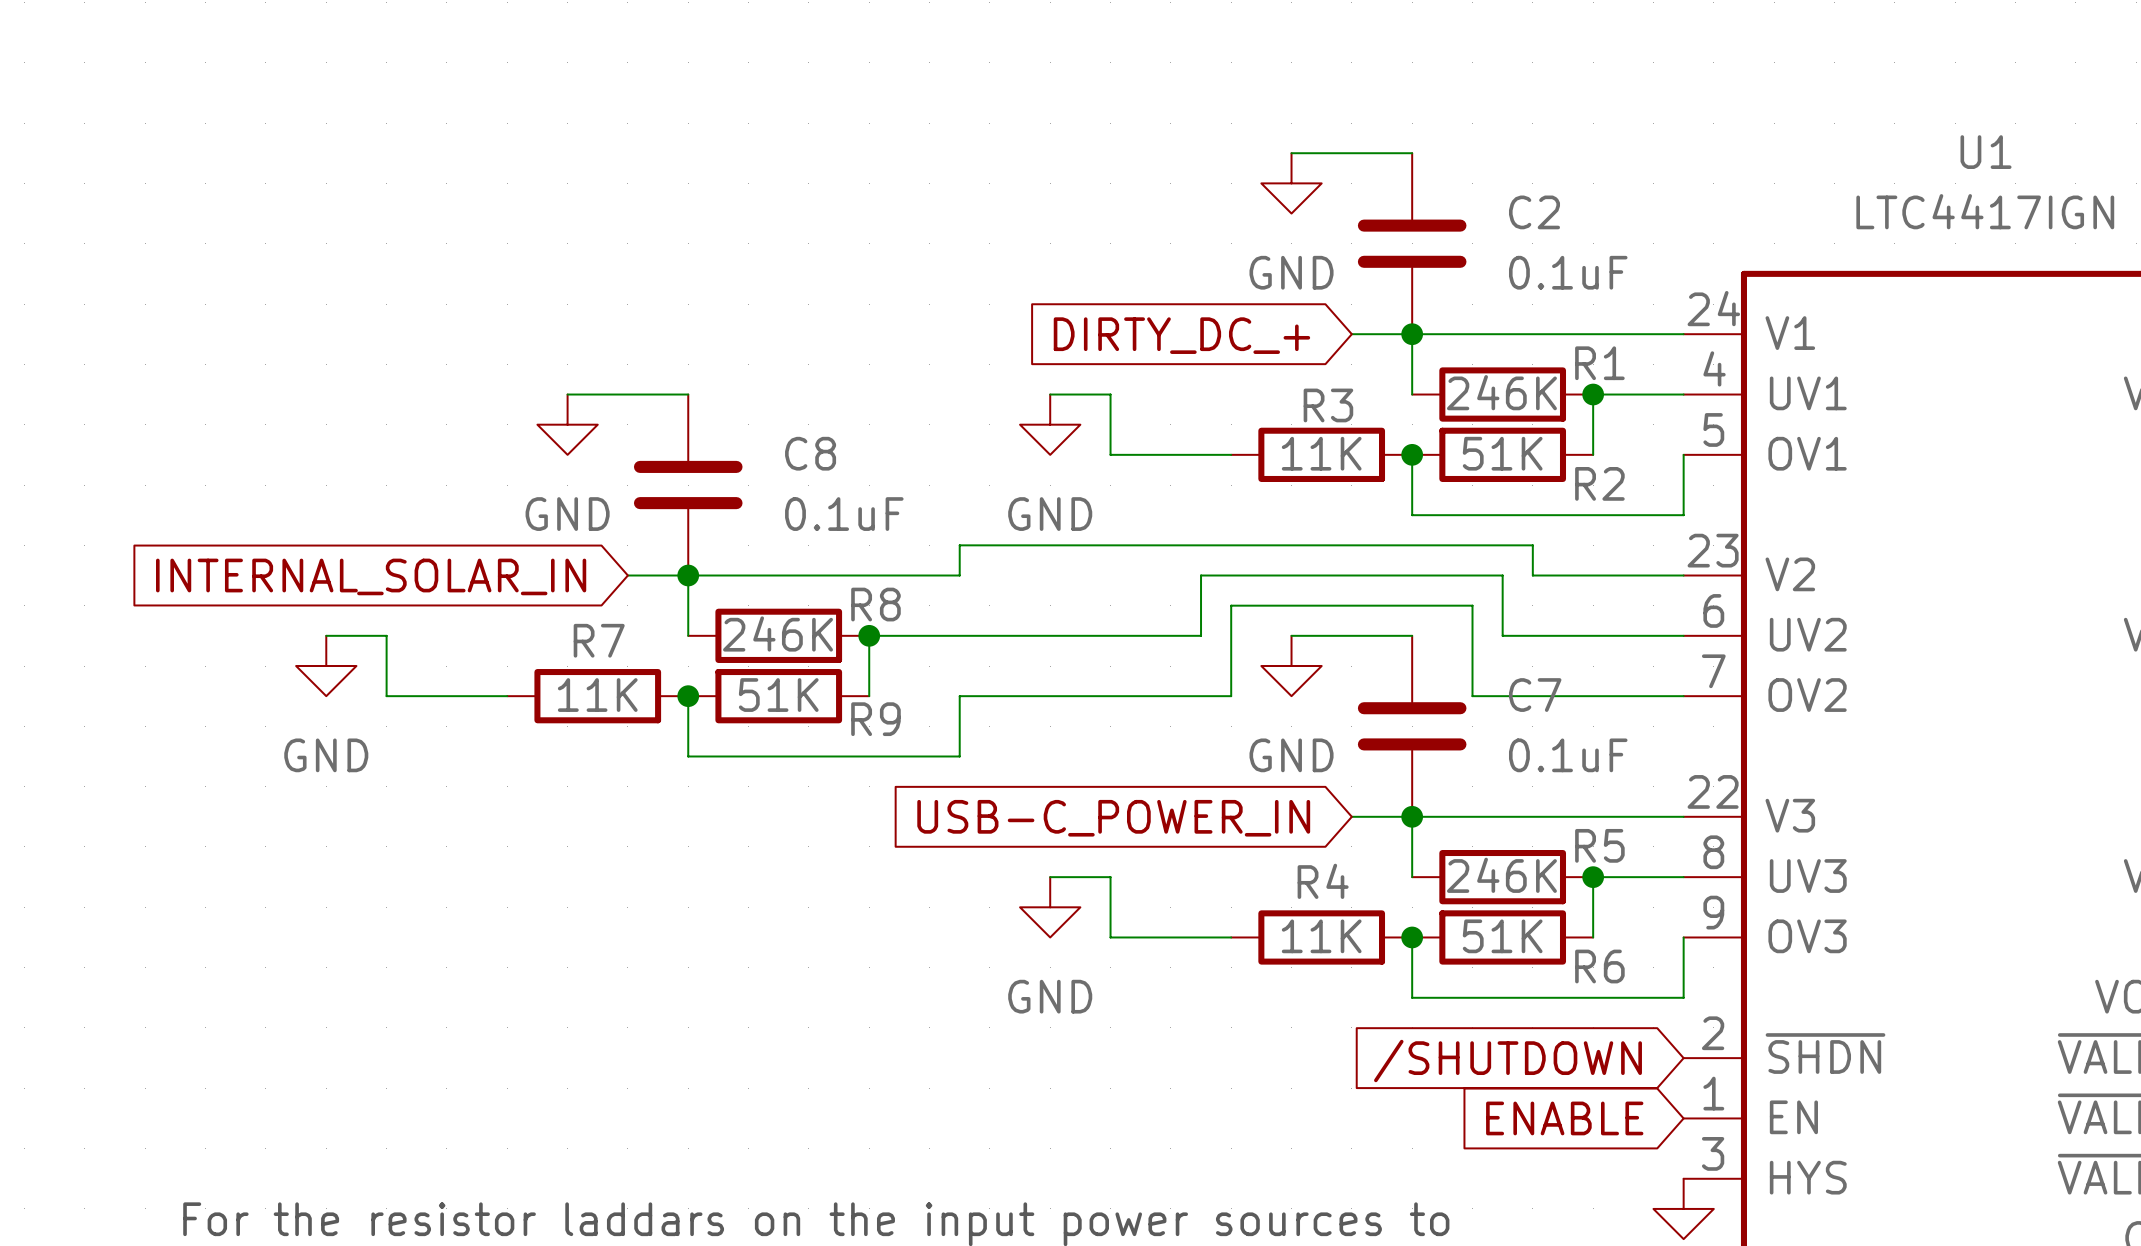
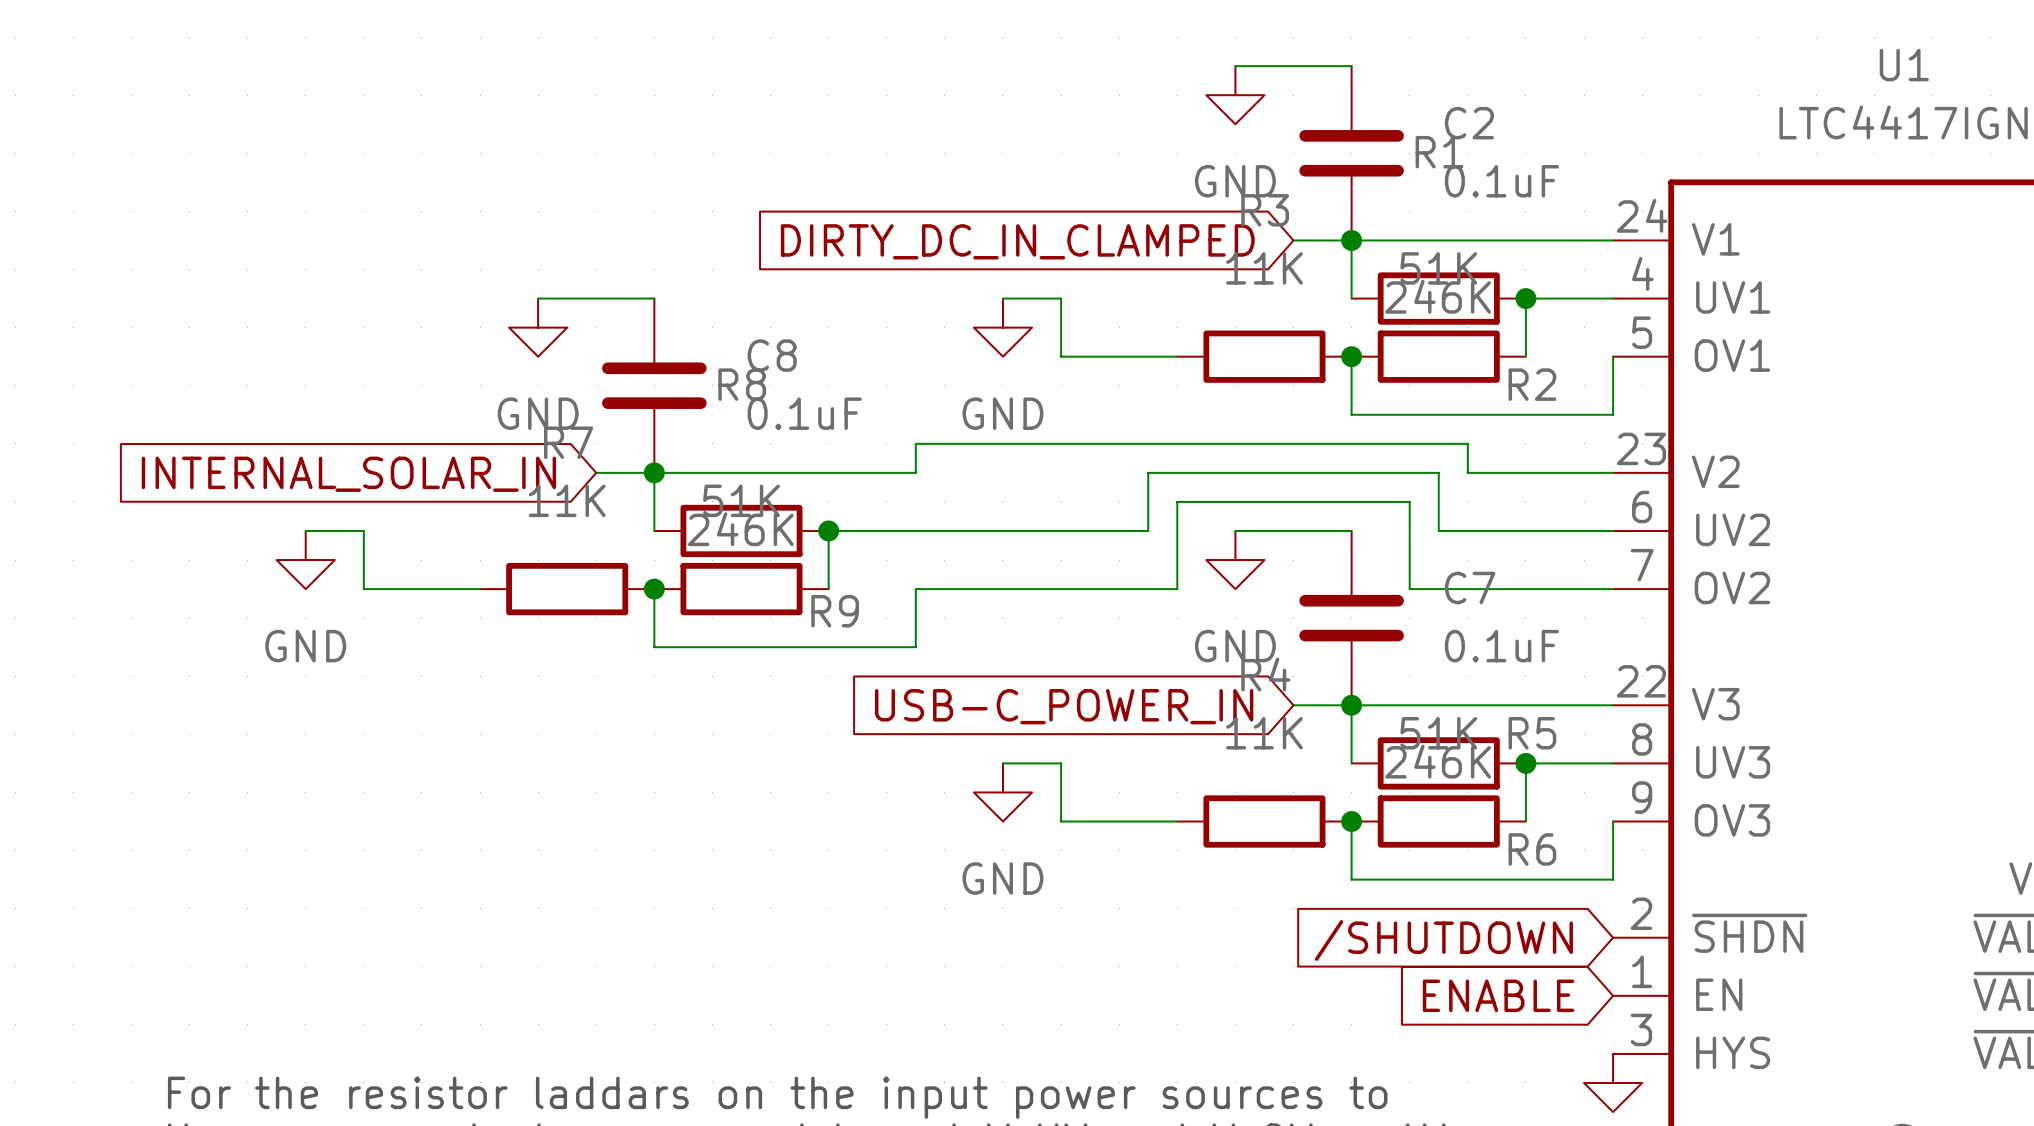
global label: DIRTY_DC_+ (1181, 335) -> DIRTY_DC_IN_CLAMPED (1017, 241)
R1 name position: R1 (1599, 363) -> R1 (1439, 152)
R3 name position: R3 (1328, 405) -> R3 (1265, 210)
R3 value position: 11K (1321, 453) -> 11K (1264, 268)
R2 value position: 51K (1502, 453) -> 51K (1438, 268)
R8 name position: R8 (875, 604) -> R8 (742, 384)
R7 name position: R7 (599, 640) -> R7 (568, 442)
R7 value position: 11K (597, 695) -> 11K (567, 500)
R9 value position: 51K (778, 695) -> 51K (741, 500)
R4 name position: R4 (1323, 881) -> R4 (1265, 674)
R4 value position: 11K (1321, 936) -> 11K (1264, 733)
R6 value position: 51K (1502, 936) -> 51K (1438, 733)

